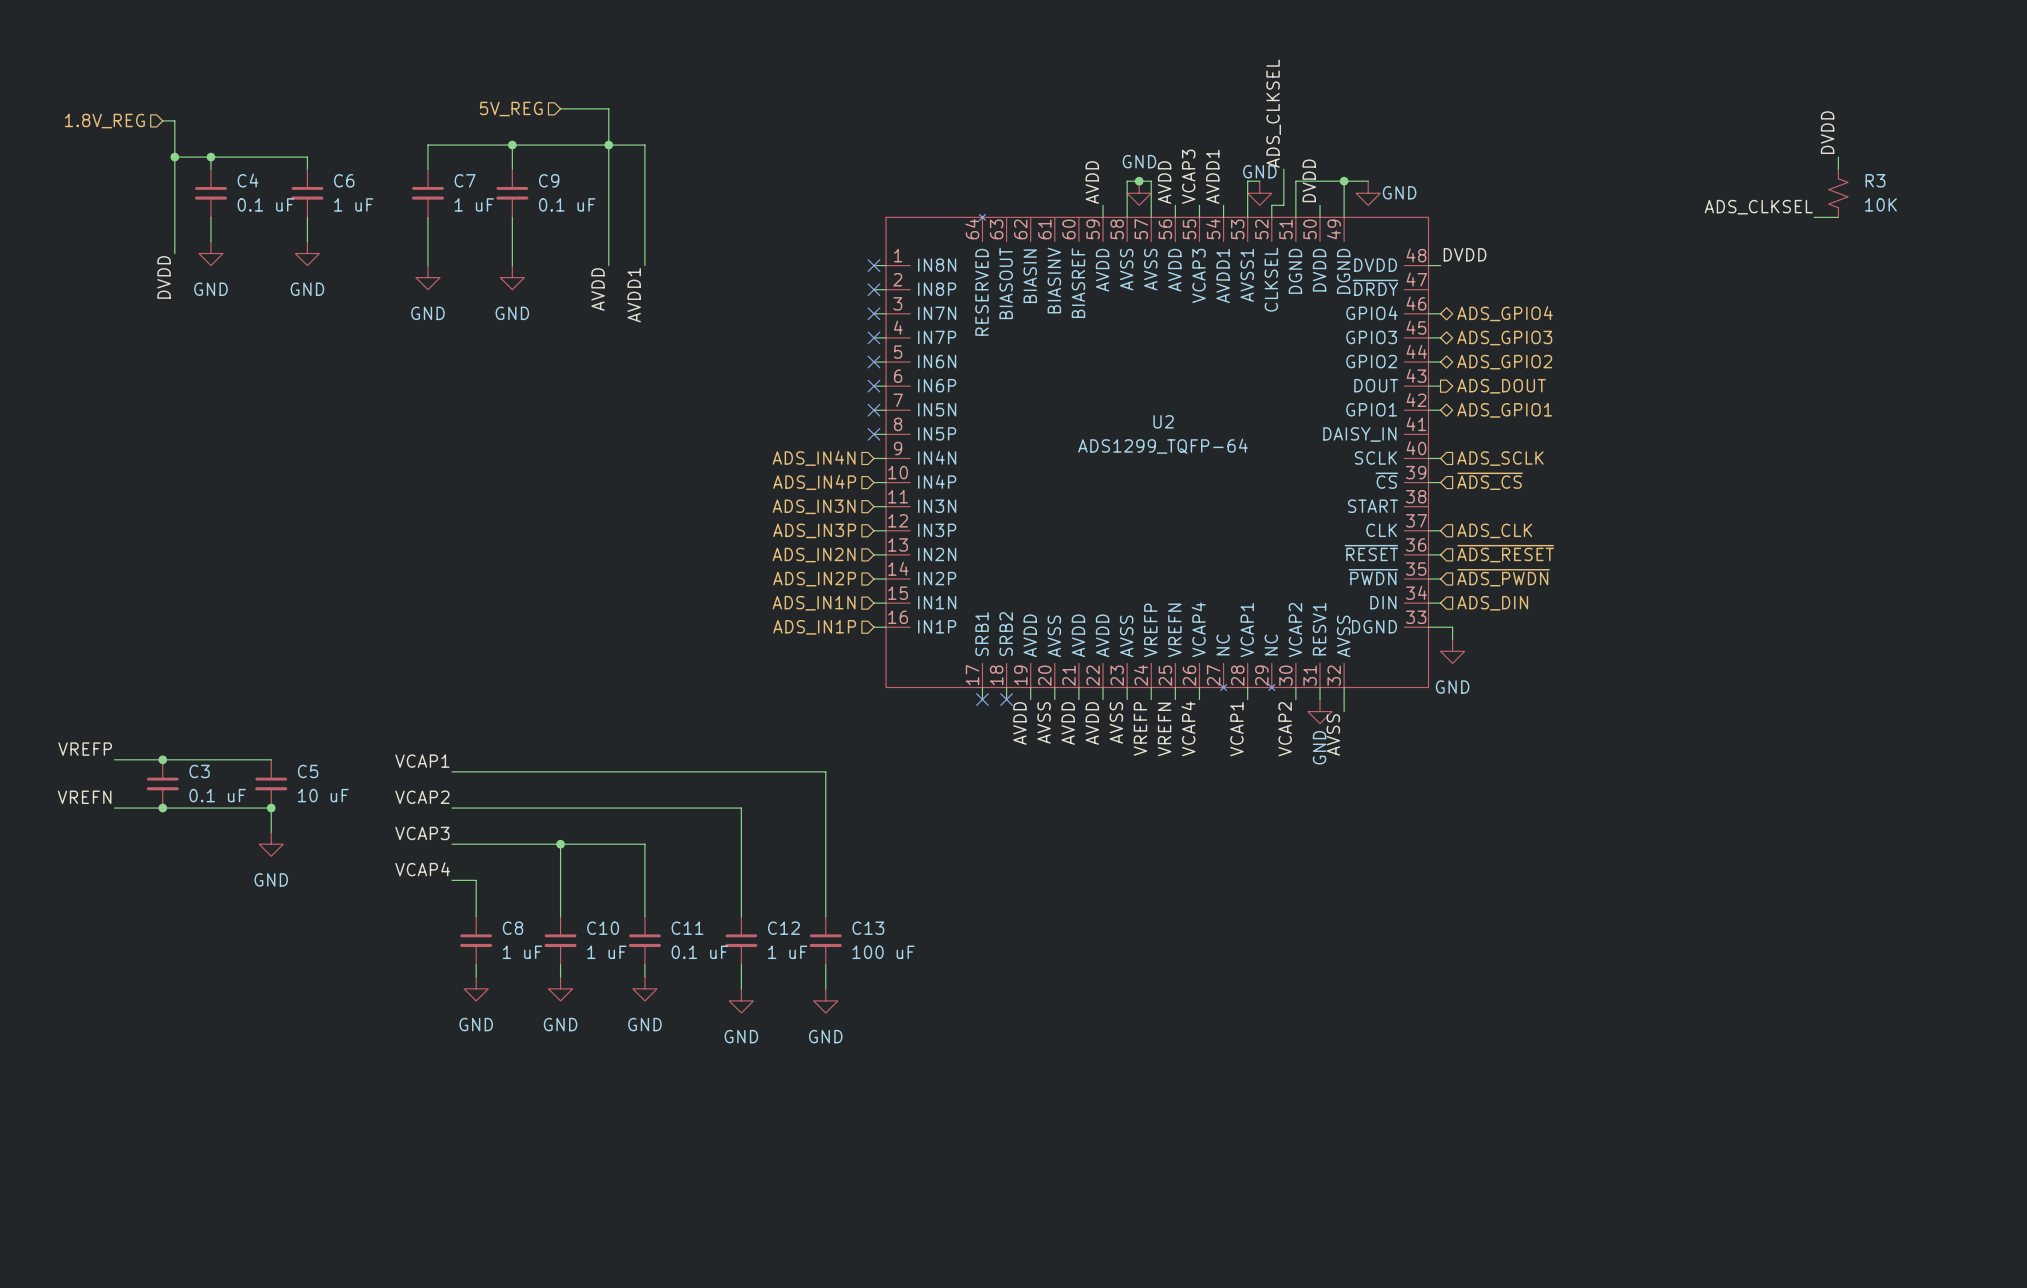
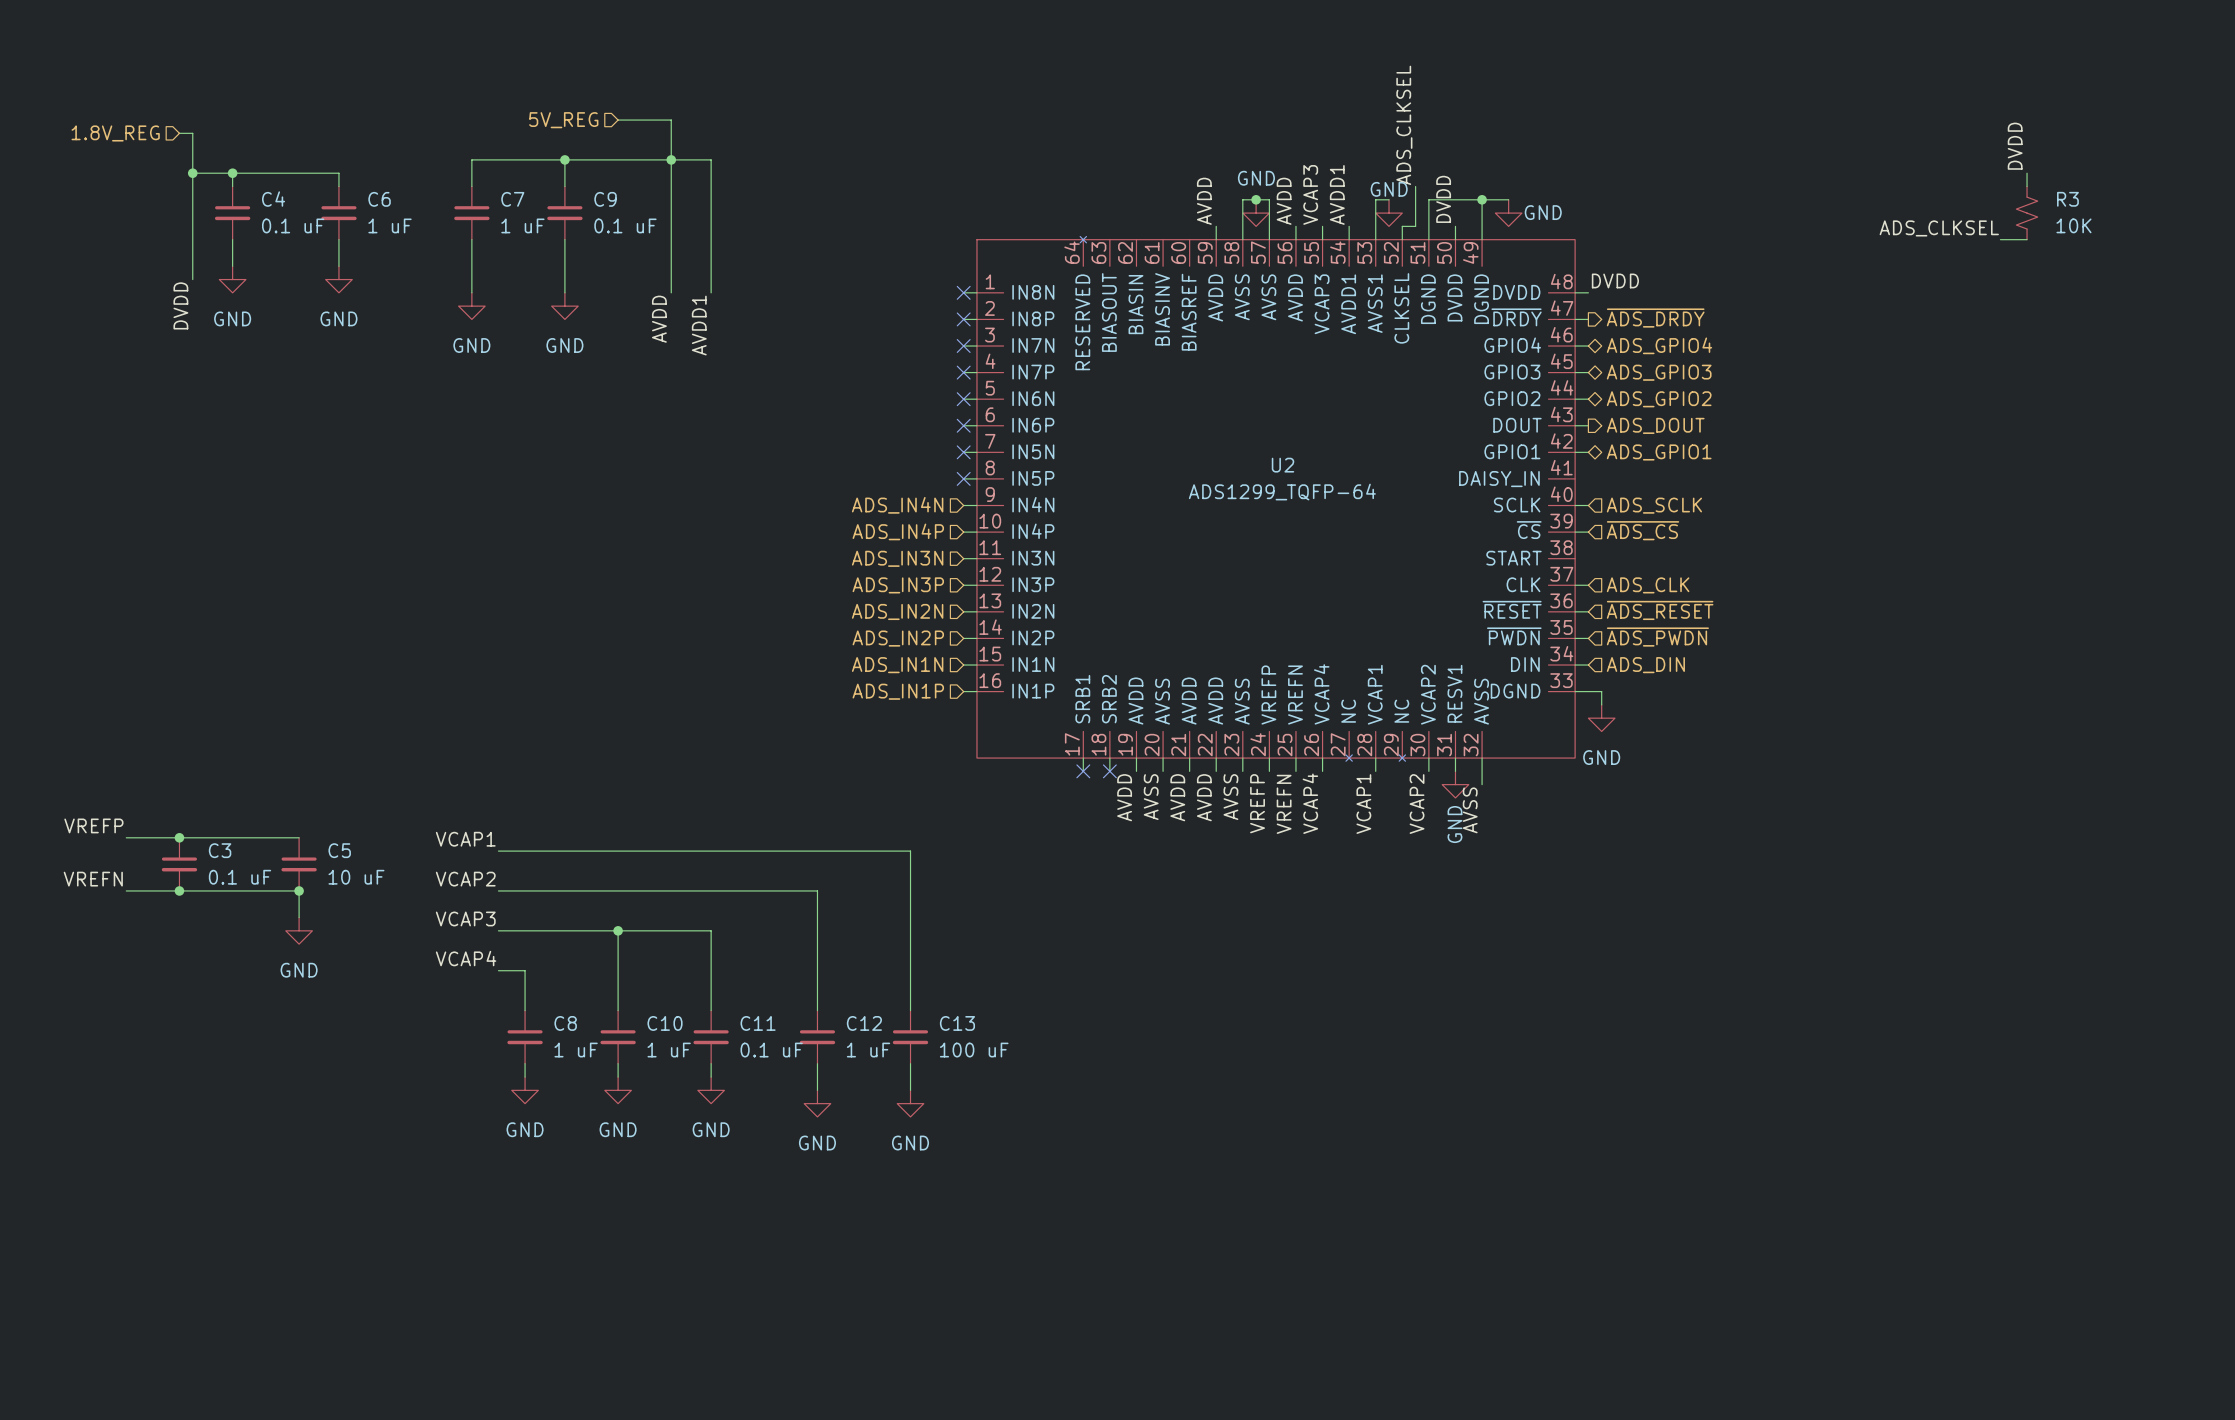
hierarchical label: none -> ~{ADS_DRDY} (1655, 318)
wire: none -> (1575, 319) (1588, 319)

